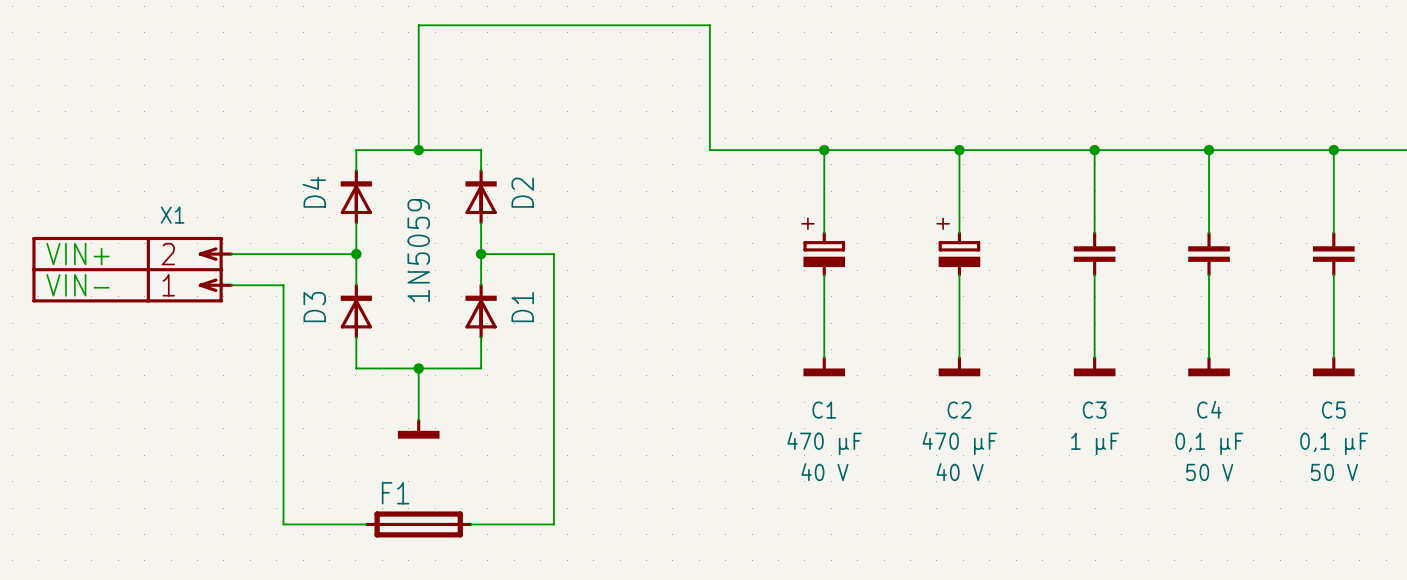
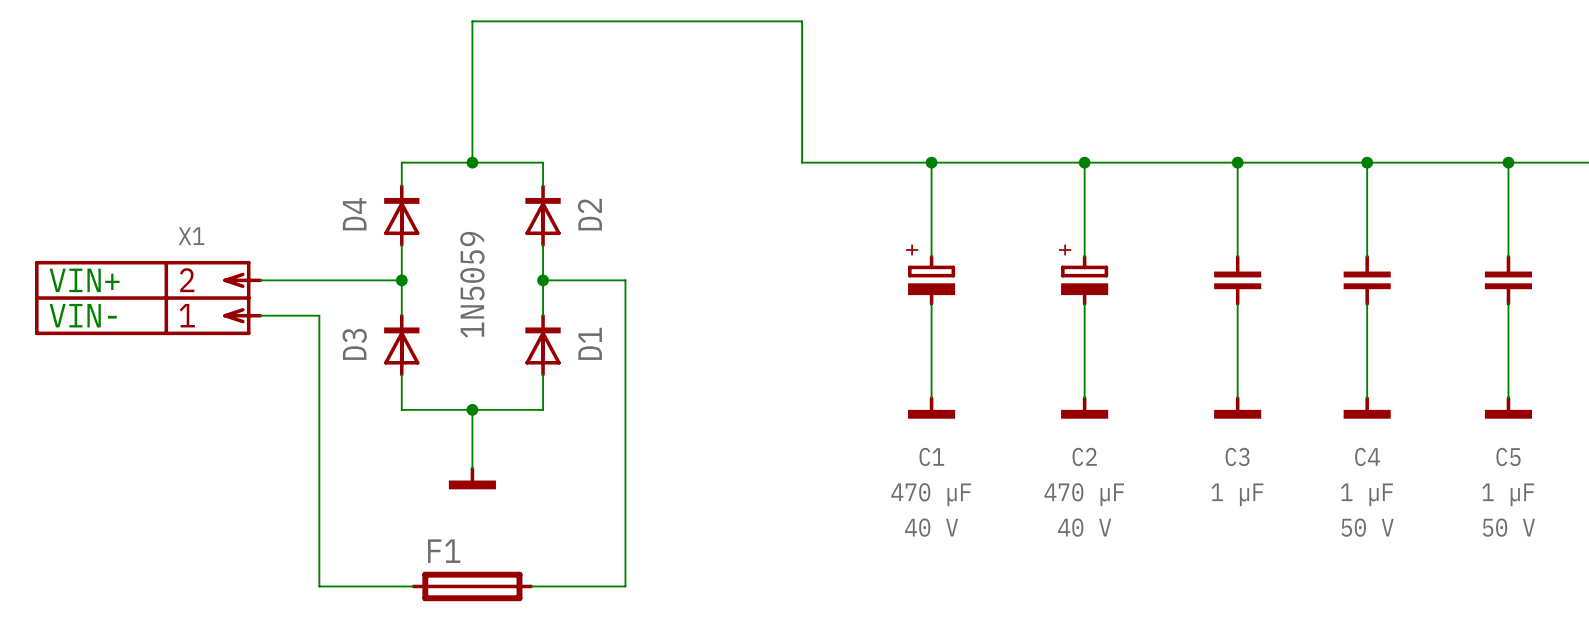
C4 value: 0,1 µF (1209, 443) -> 1 µF (1366, 494)
C5 value: 0,1 µF (1334, 443) -> 1 µF (1508, 494)

